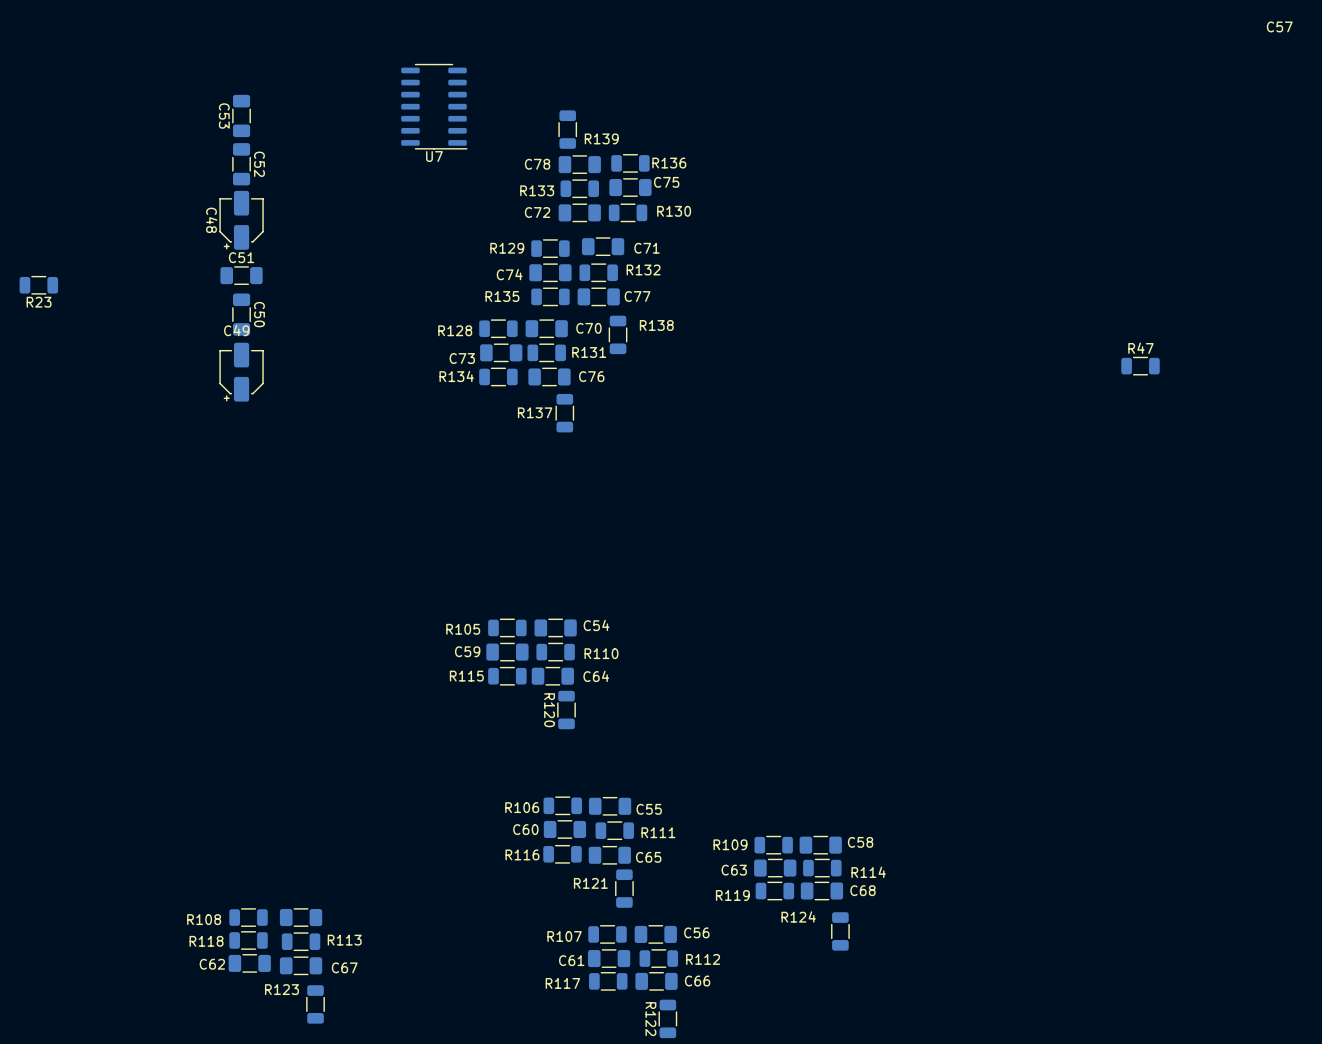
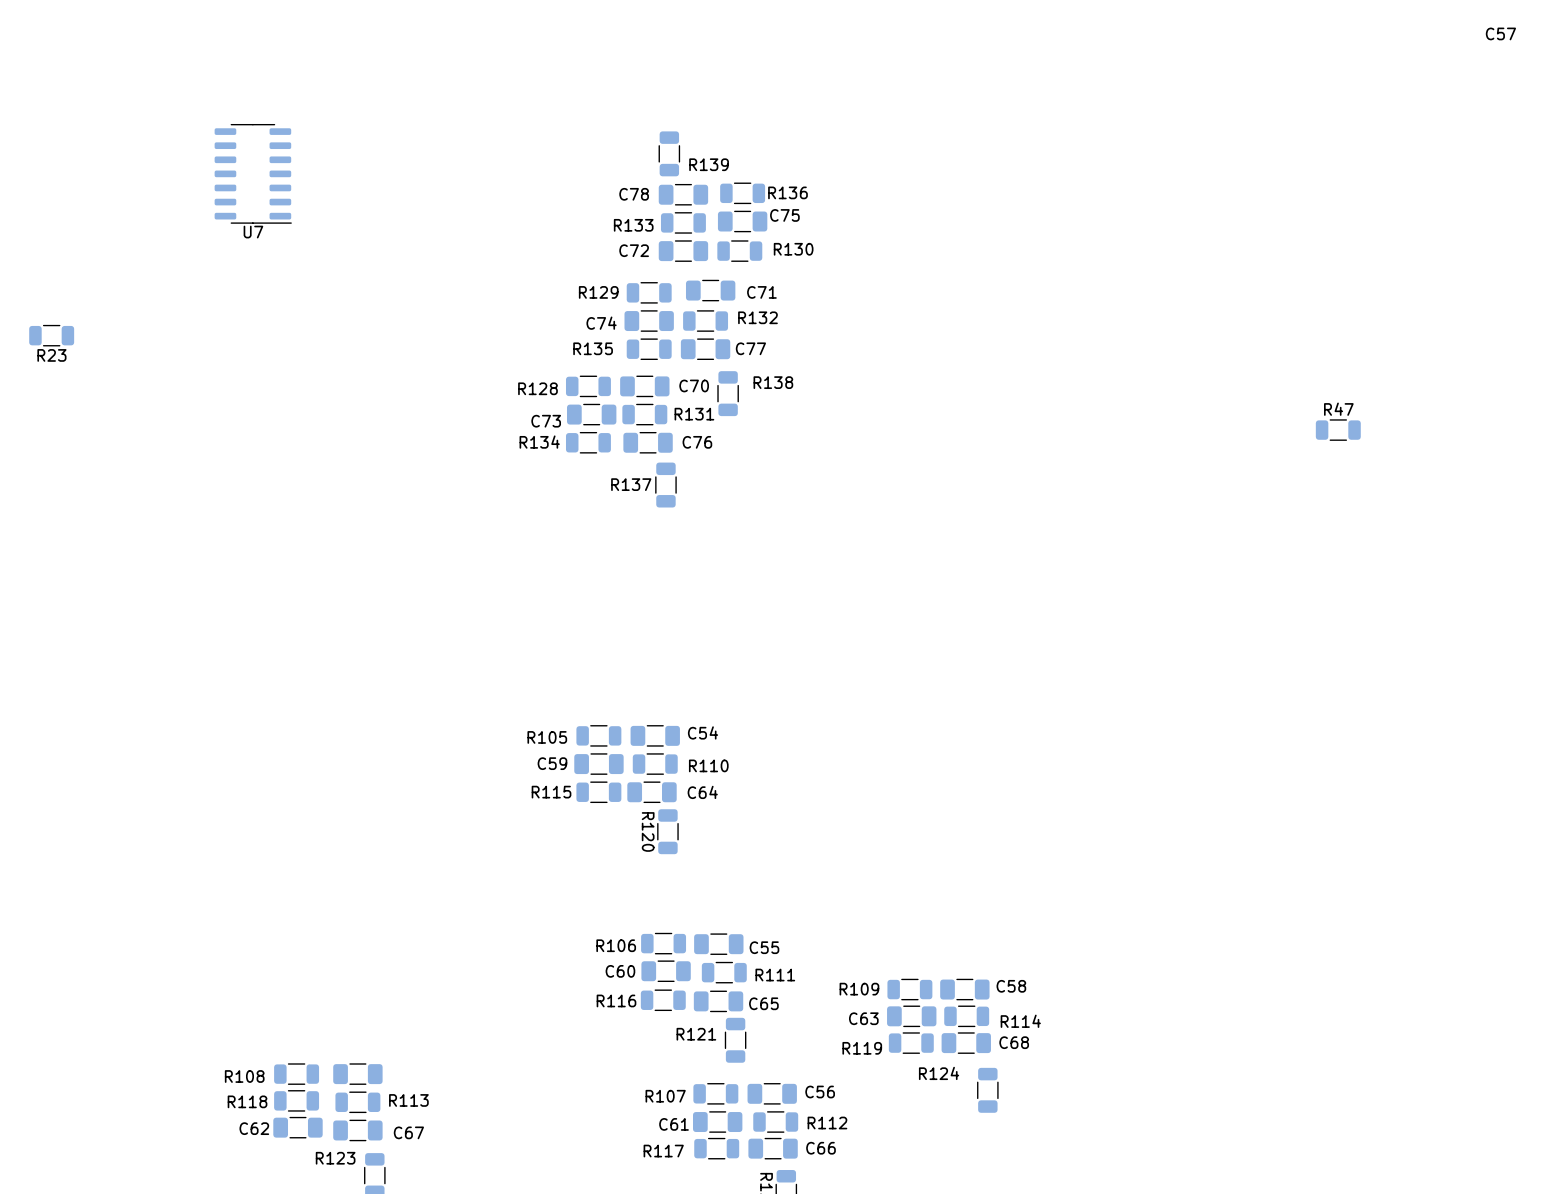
U7 position: (434, 106) -> (253, 173)
C53: (241, 115) -> none
C52: (241, 164) -> none
C48: (241, 220) -> none
C51: (241, 275) -> none
C50: (241, 314) -> none
C49: (241, 372) -> none

